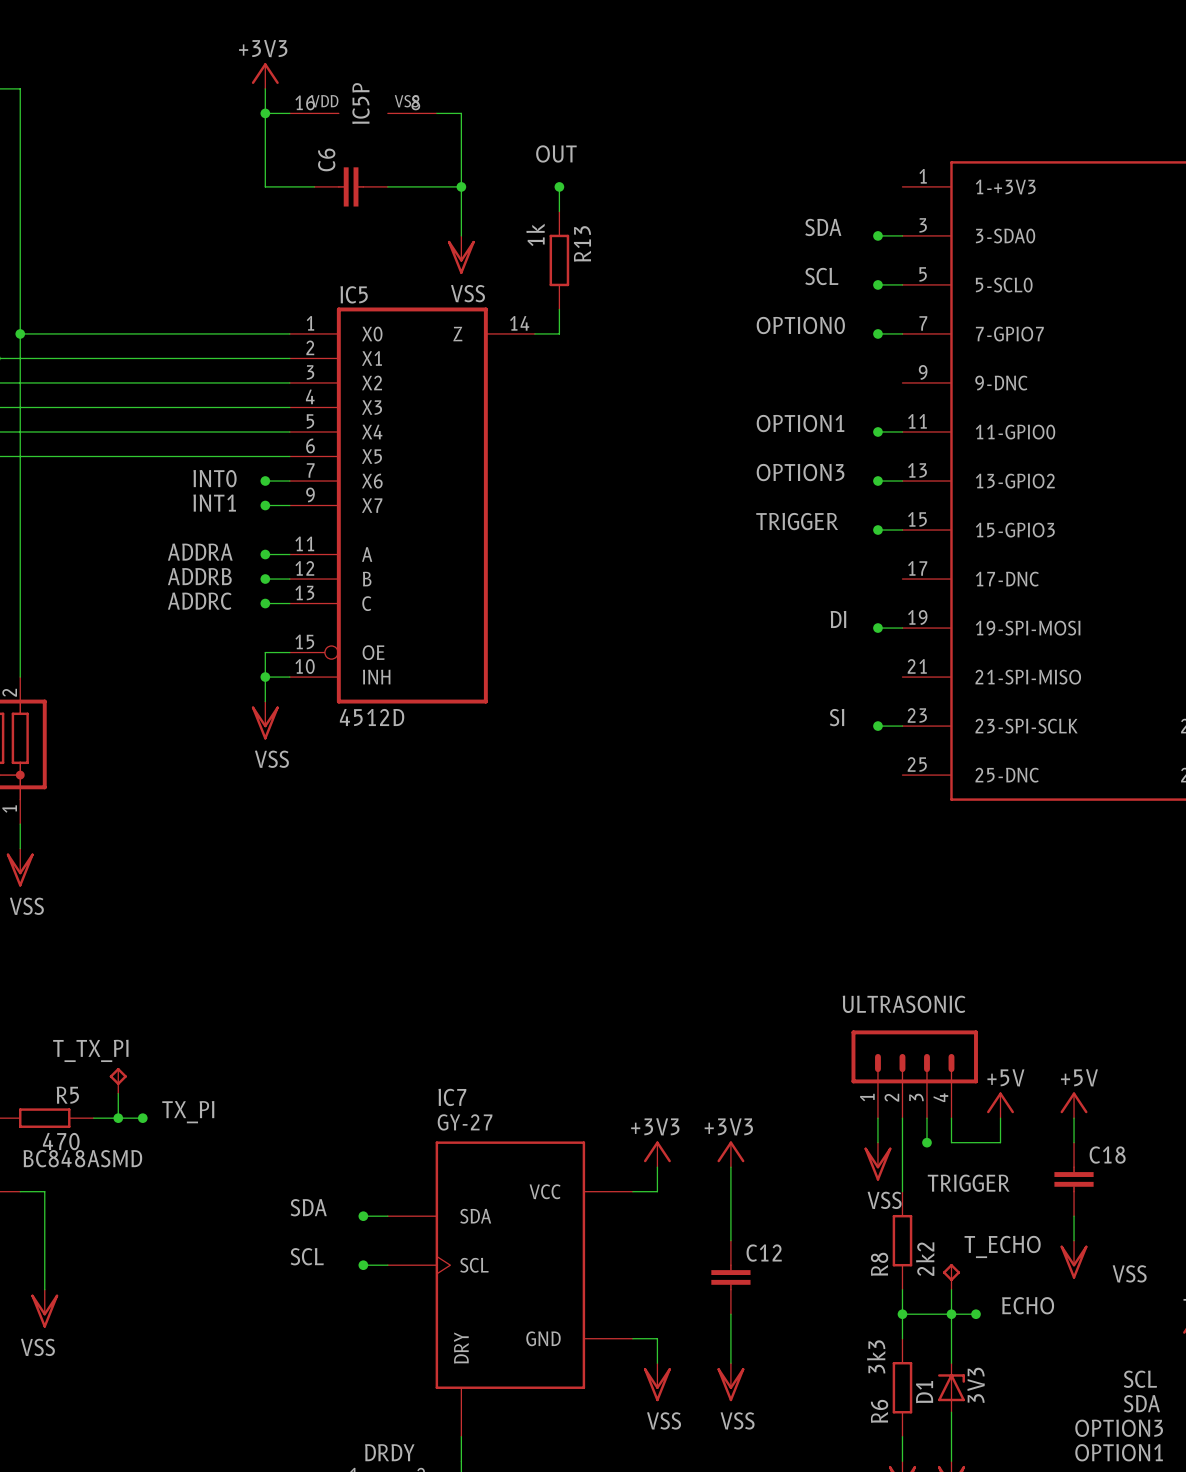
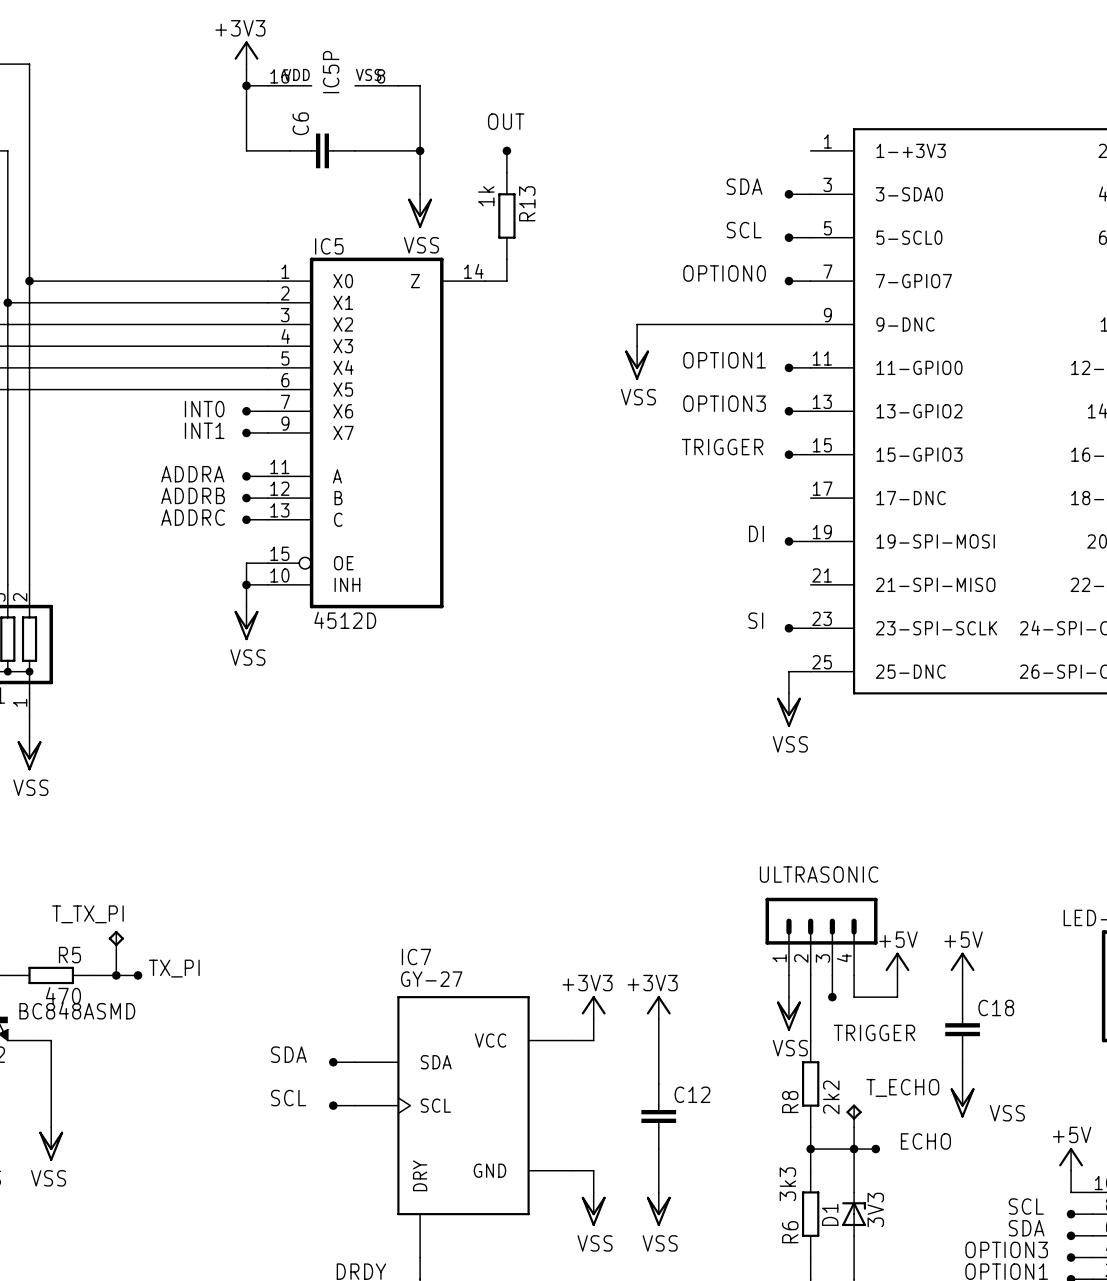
wire: none -> (810, 324) (637, 324) (637, 346)
power symbol: none -> VSS (637, 363)
wire: none -> (810, 671) (788, 671) (788, 693)
power symbol: none -> VSS (788, 710)

